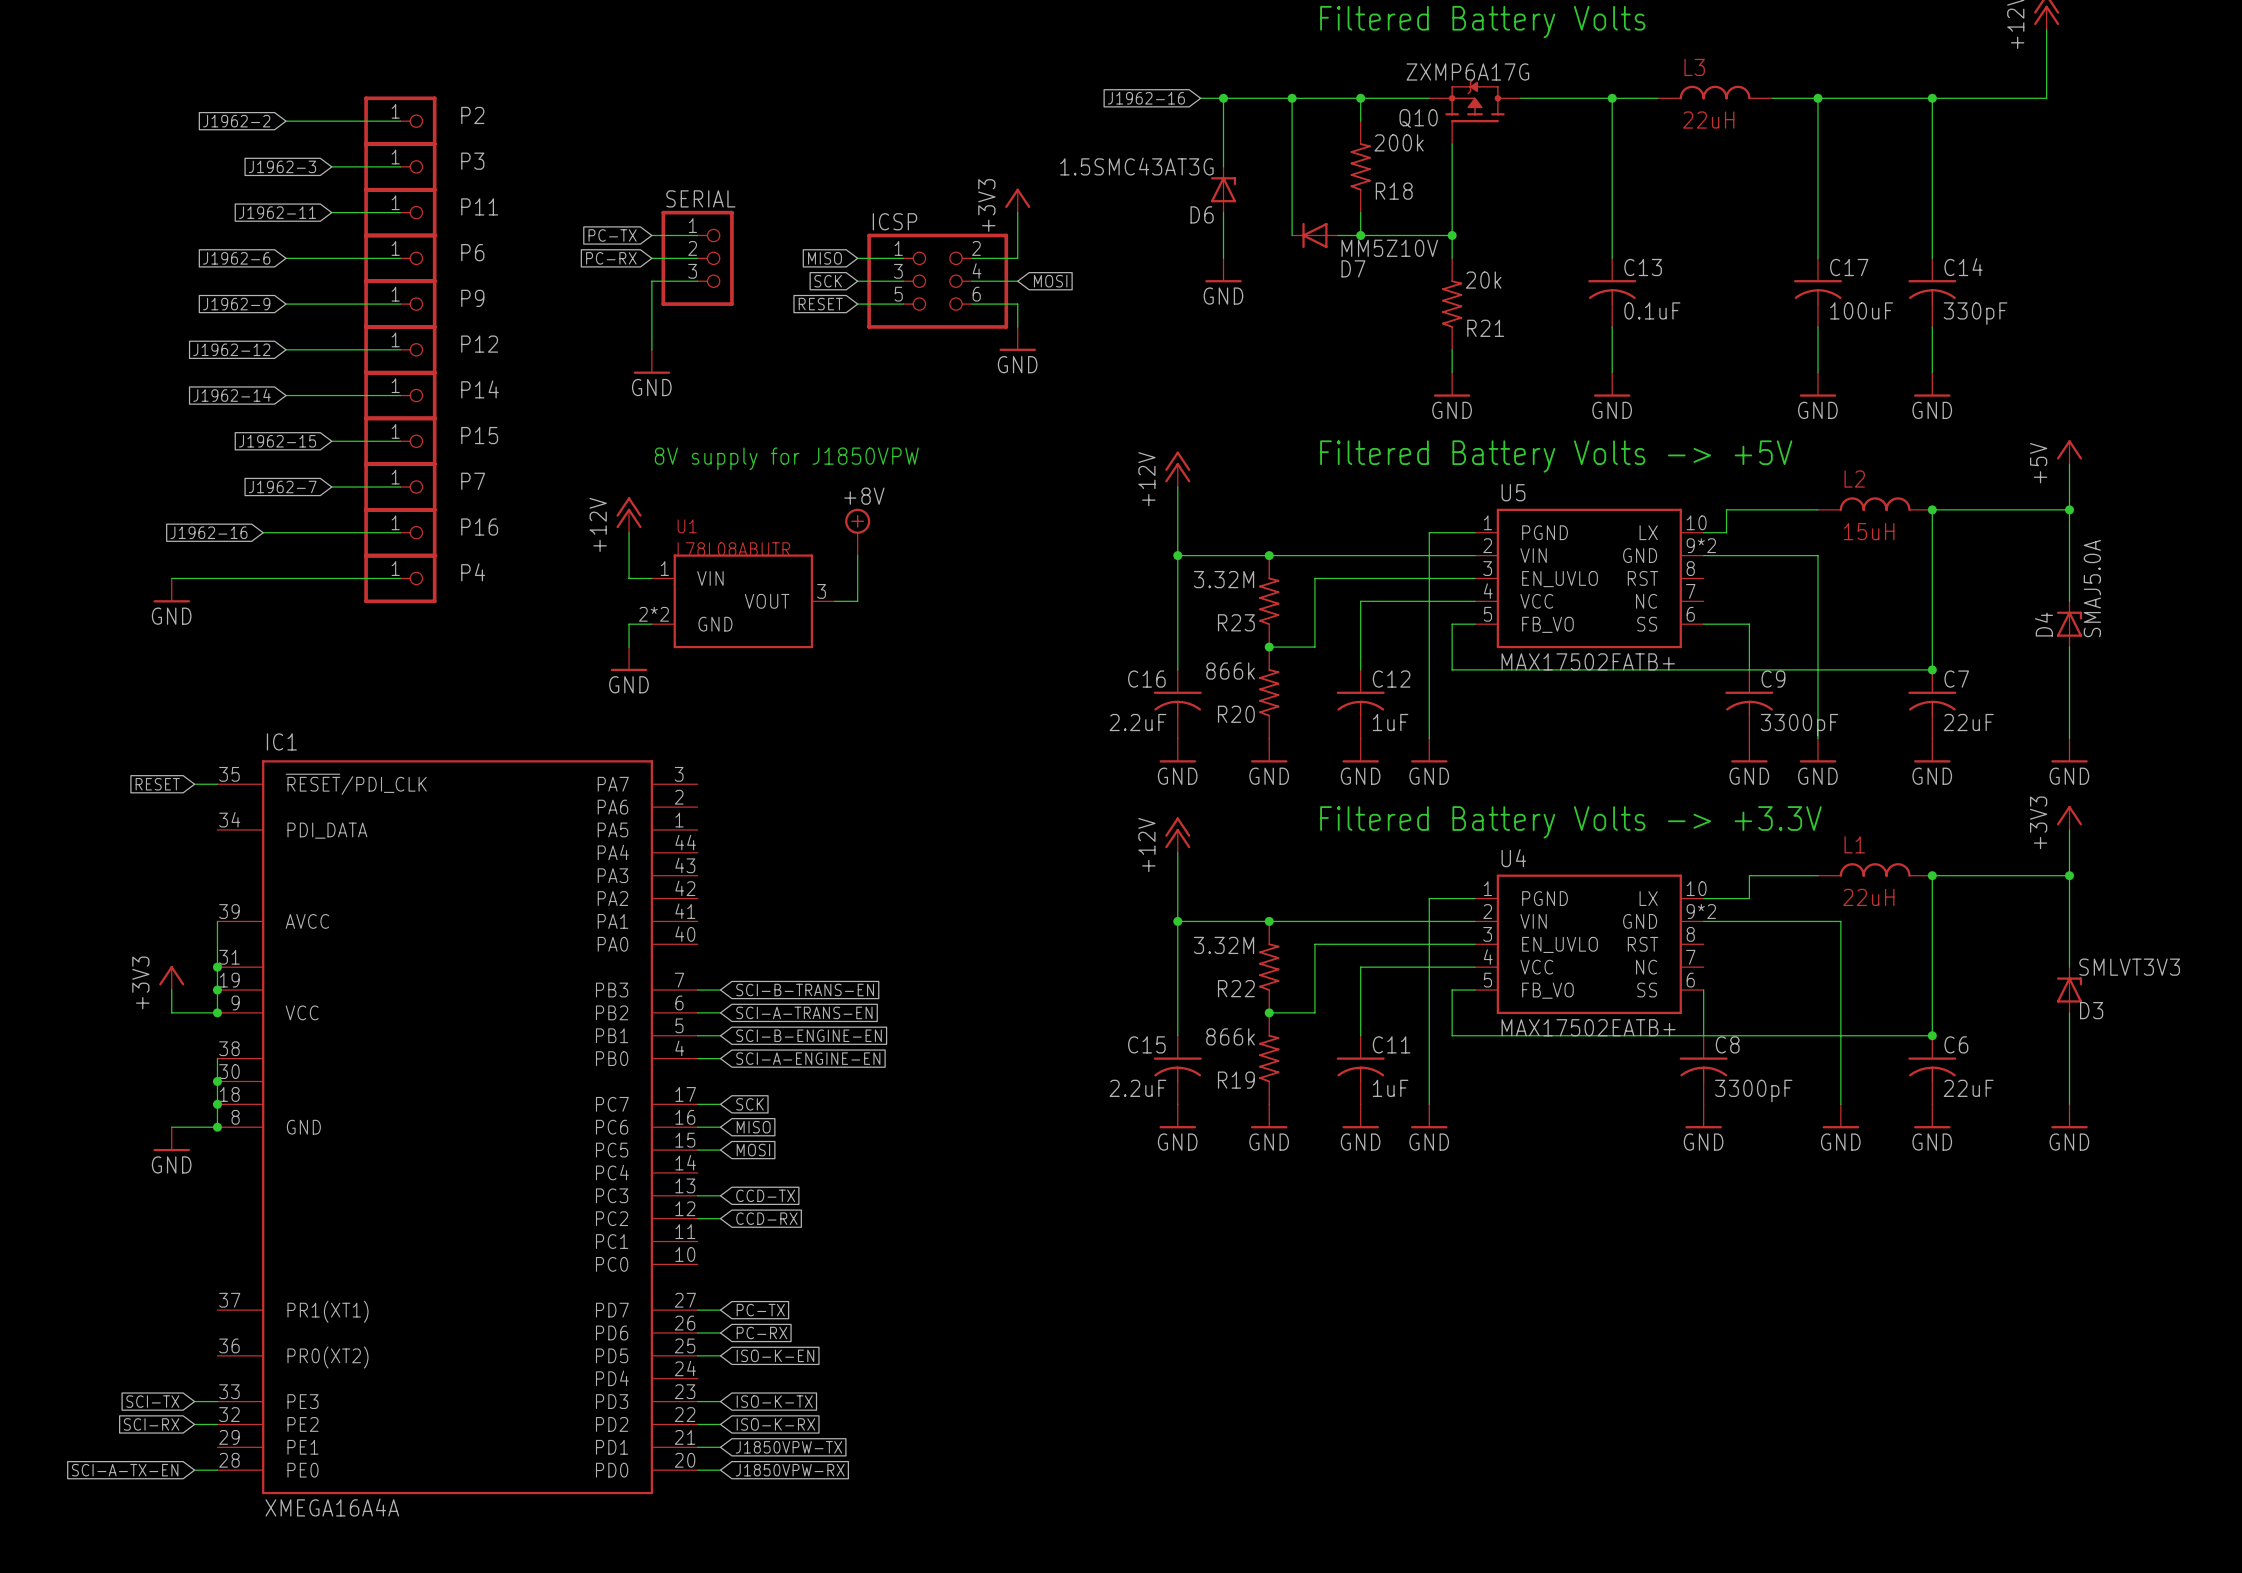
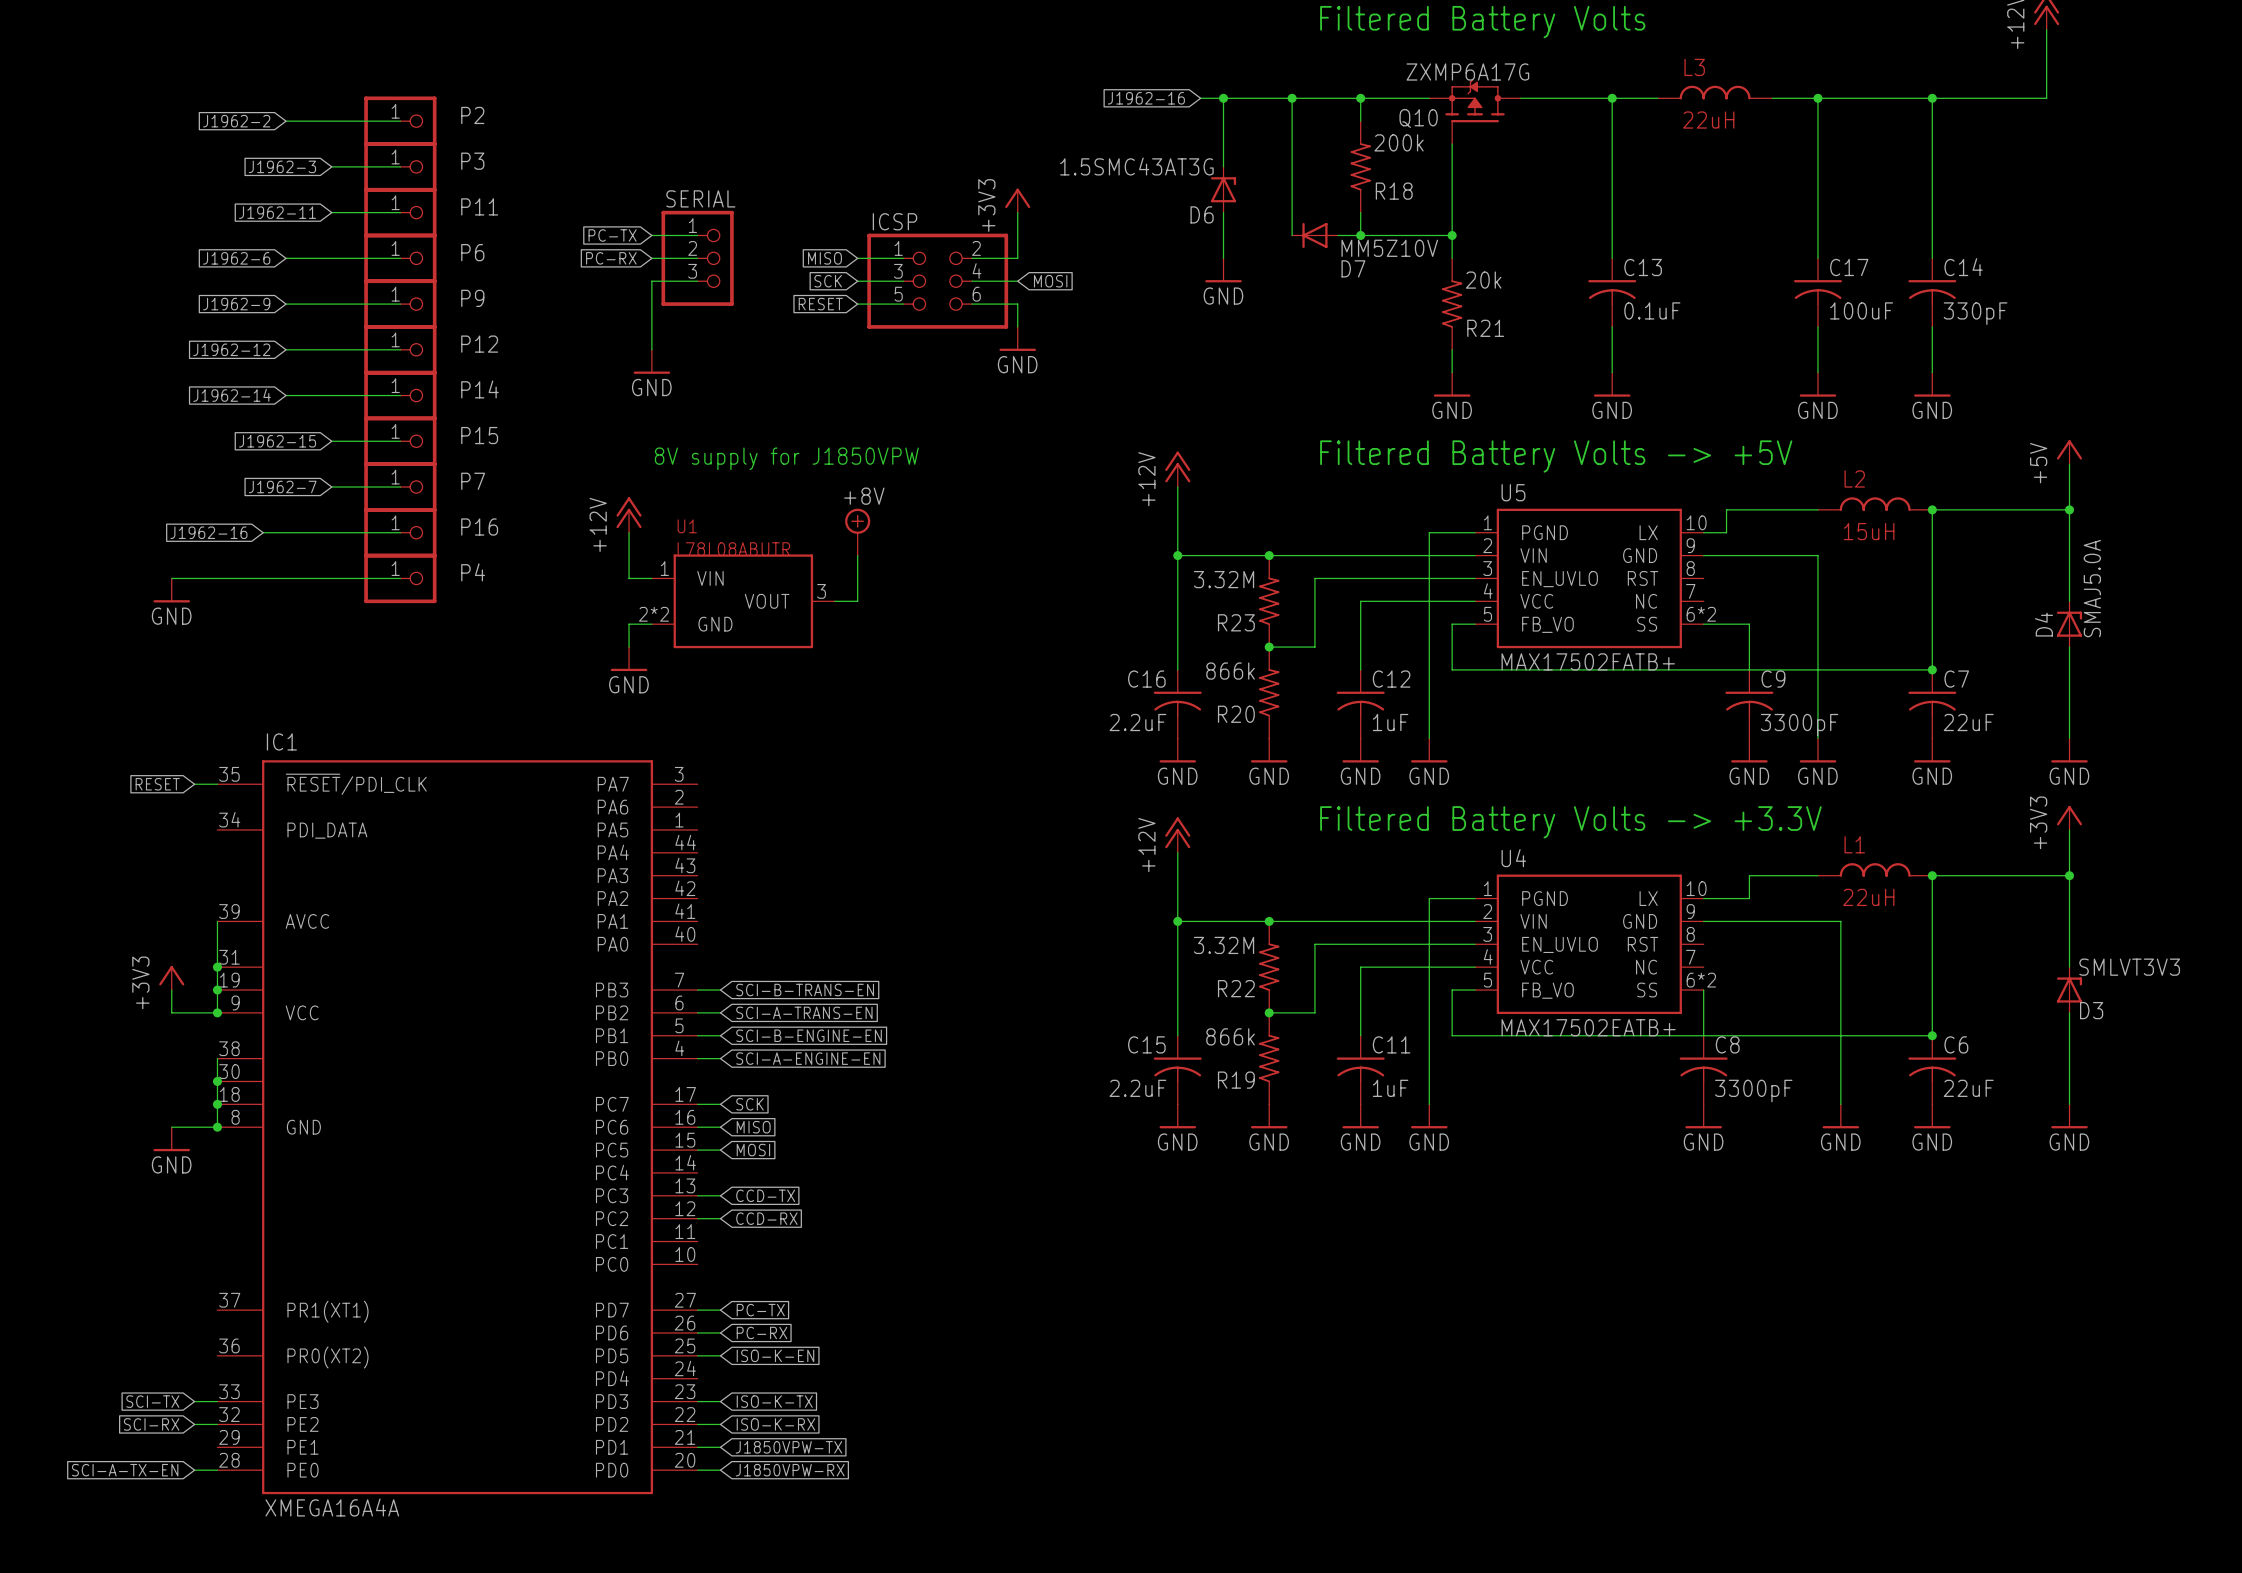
U5 pin number: 9*2 (1701, 545) -> 9 (1690, 545)
U5 pin number: 6 (1690, 614) -> 6*2 (1701, 614)
U4 pin number: 9*2 (1701, 911) -> 9 (1690, 911)
U4 pin number: 6 (1690, 980) -> 6*2 (1701, 980)

